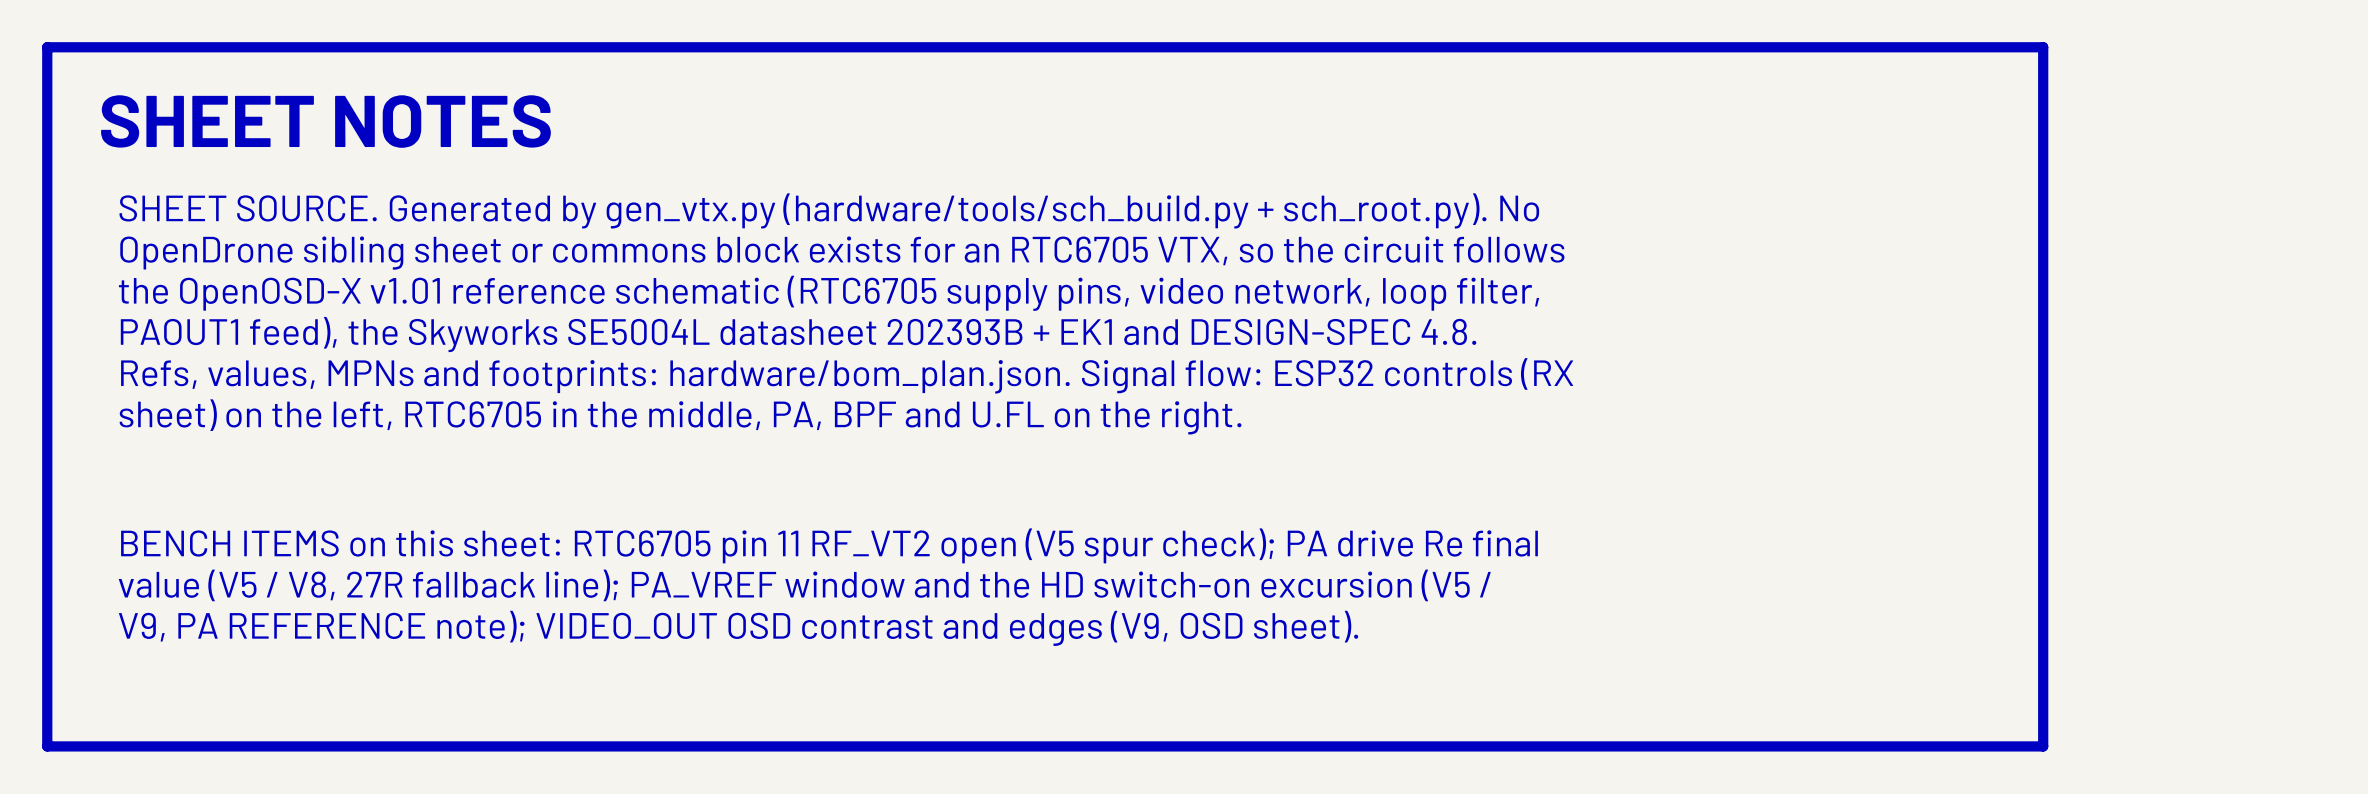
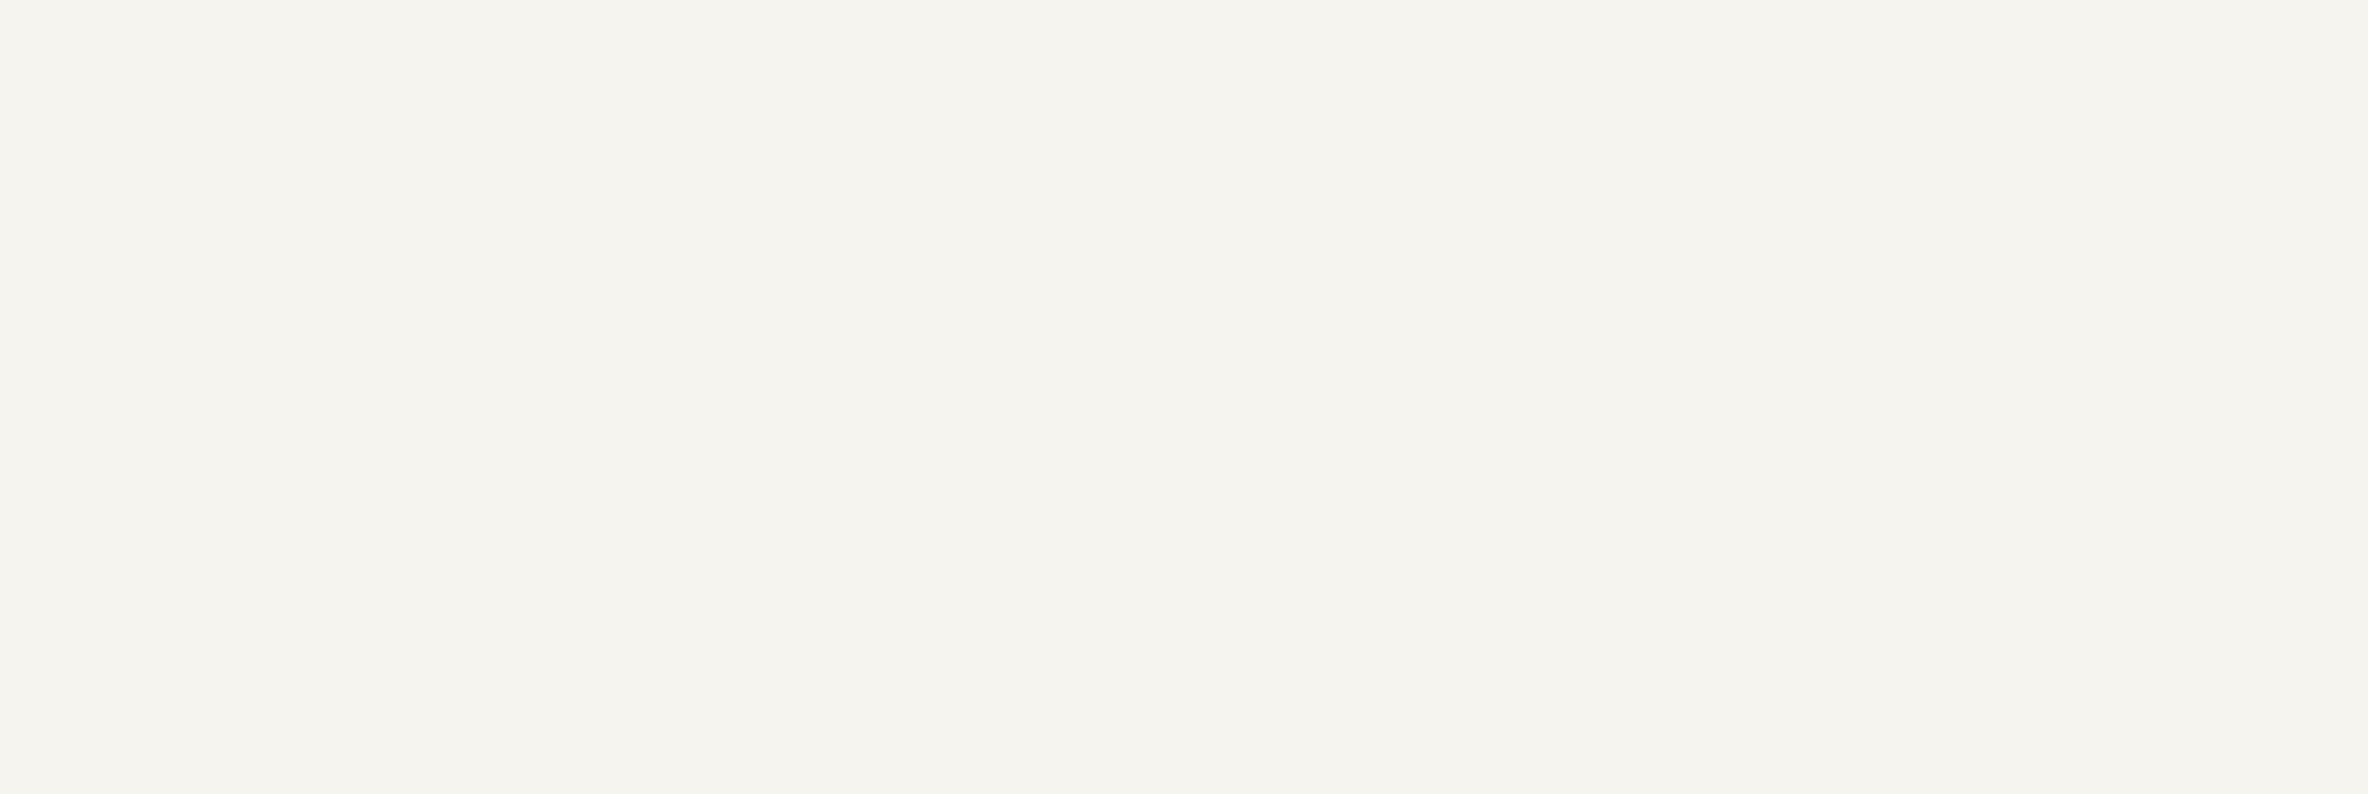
line: (47, 47) (2043, 47) (2043, 746) (47, 746) (47, 47) -> none
text: SHEET NOTES (325, 121) -> none
text: SHEET SOURCE. Generated by gen_vtx.py (hardware/tools/sch_build.py + sch_root.py). No (829, 210) -> none
text: OpenDrone sibling sheet or commons block exists for an RTC6705 VTX, so the circuit follows (842, 253) -> none
text: the OpenOSD-X v1.01 reference schematic (RTC6705 supply pins, video network, loop filter, (829, 293) -> none
text: PAOUT1 feed), the Skyworks SE5004L datasheet 202393B + EK1 and DESIGN-SPEC 4.8. (798, 334) -> none
text: Refs, values, MPNs and footprints: hardware/bom_plan.json. Signal flow: ESP32 controls (RX (847, 375) -> none
text: sheet) on the left, RTC6705 in the middle, PA, BPF and U.FL on the right. (680, 416) -> none
text: BENCH ITEMS on this sheet: RTC6705 pin 11 RF_VT2 open (V5 spur check); PA drive Re final (829, 545) -> none
text: value (V5 / V8, 27R fallback line); PA_VREF window and the HD switch-on excursion (V5 / (804, 585) -> none
text: V9, PA REFERENCE note); VIDEO_OUT OSD contrast and edges (V9, OSD sheet). (738, 628) -> none

